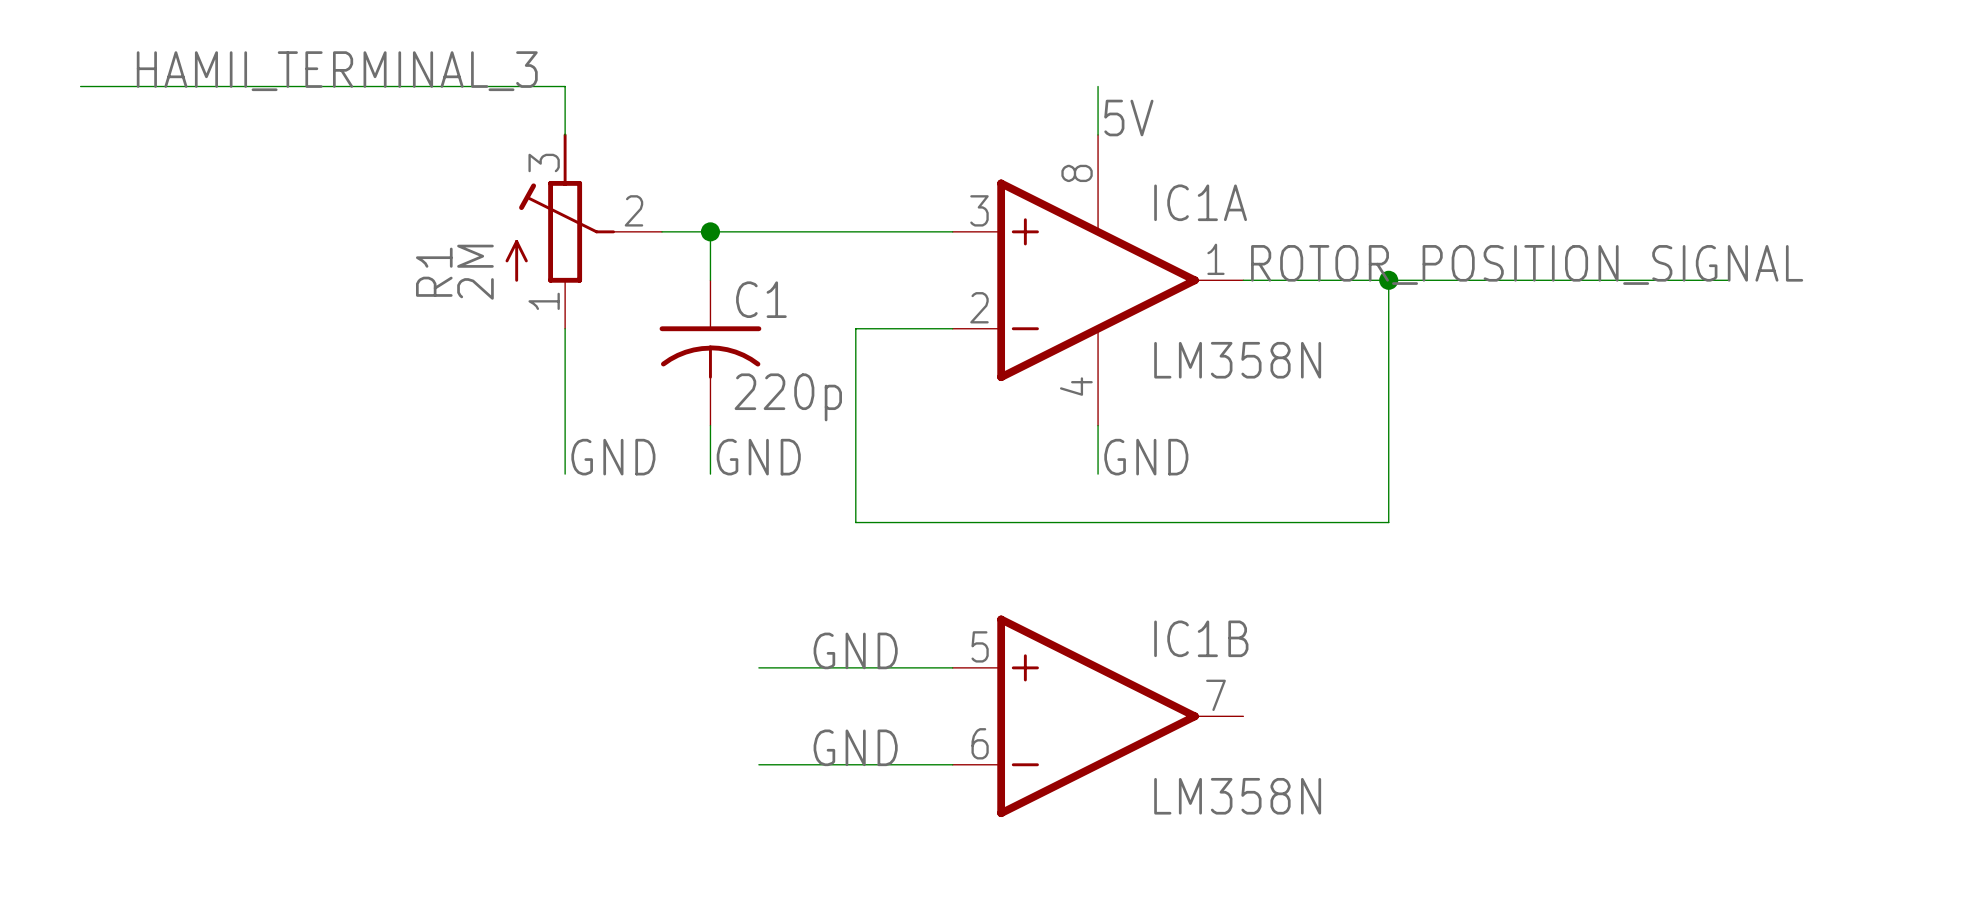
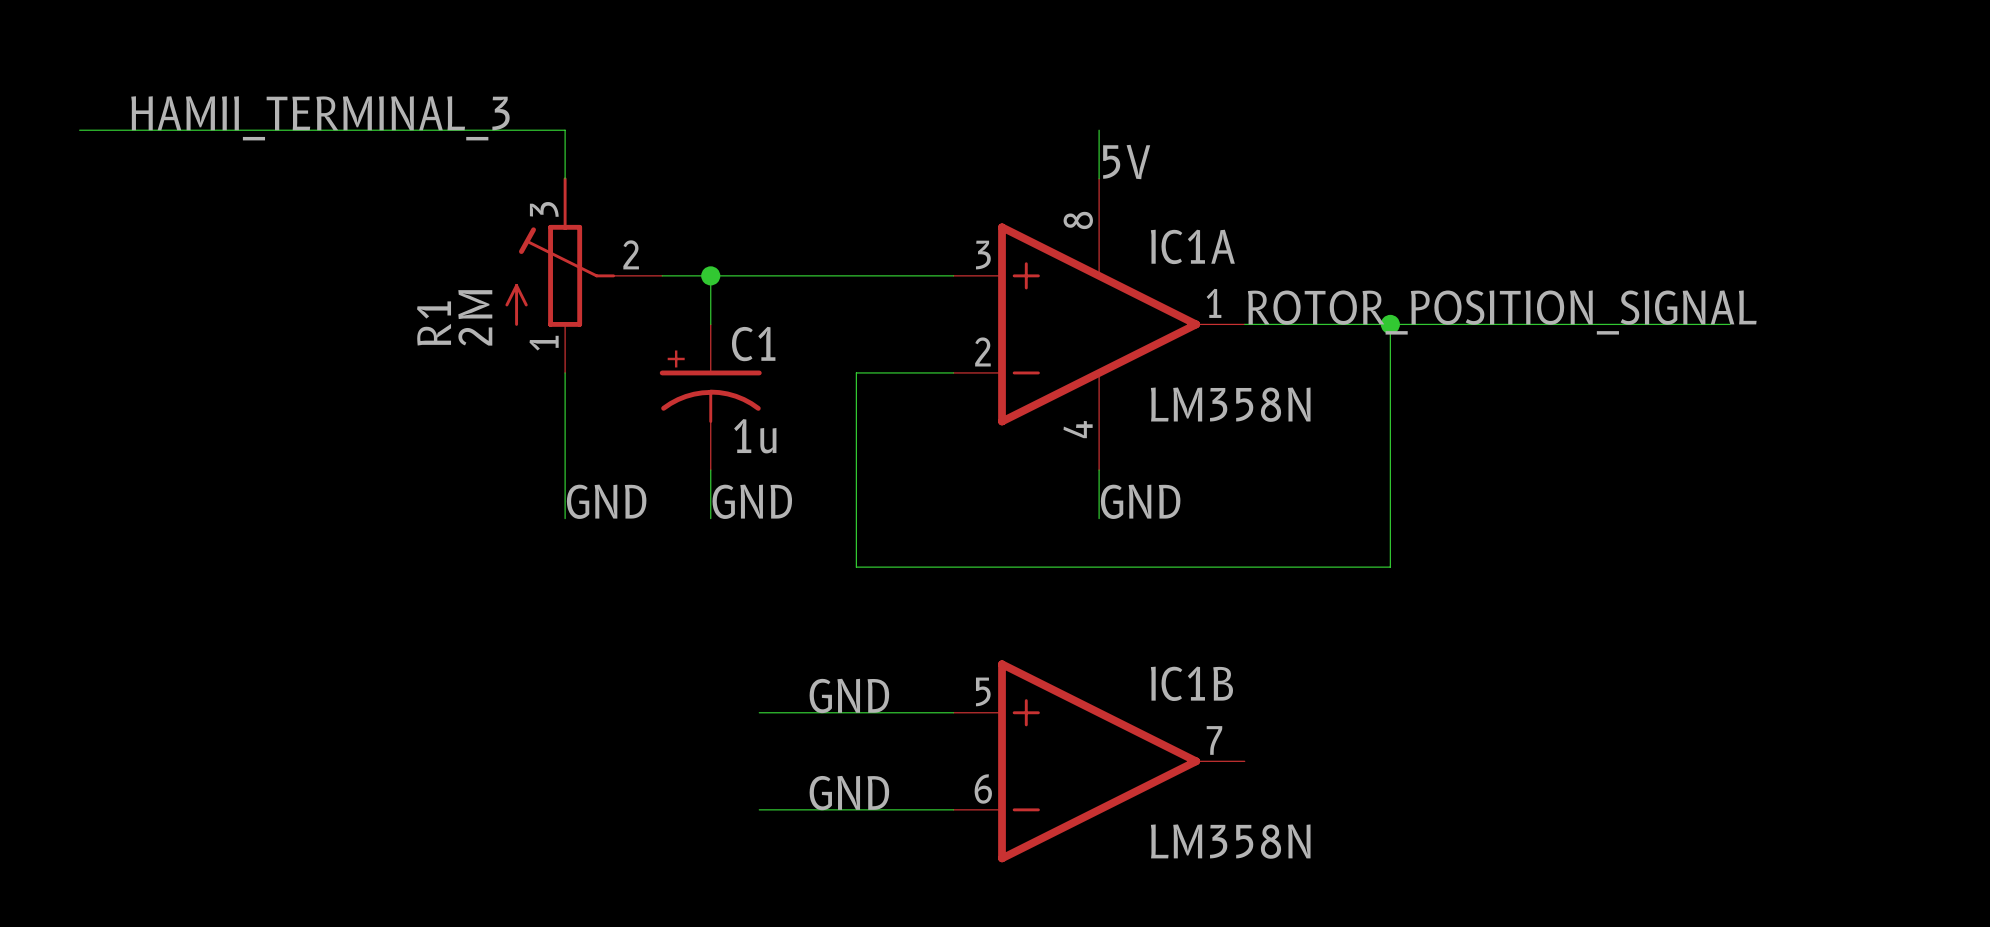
C1 symbol: [659, 280, 762, 426] -> [659, 324, 762, 471]
C1 value: 220p (788, 397) -> 1u (755, 436)

